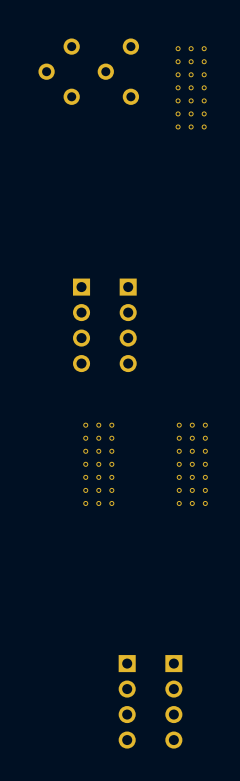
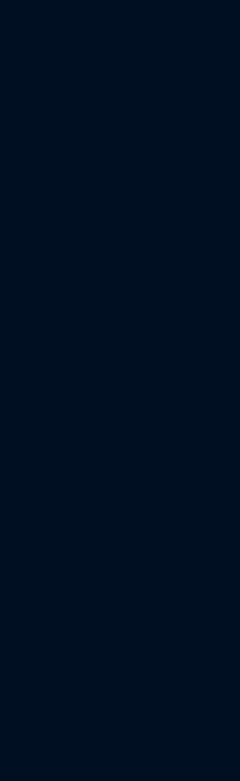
part: (59, 71) -> none
part: (118, 71) -> none
part: (191, 87) -> none
part: (81, 325) -> none
part: (128, 325) -> none
part: (98, 464) -> none
part: (192, 464) -> none
part: (127, 701) -> none
part: (173, 701) -> none

